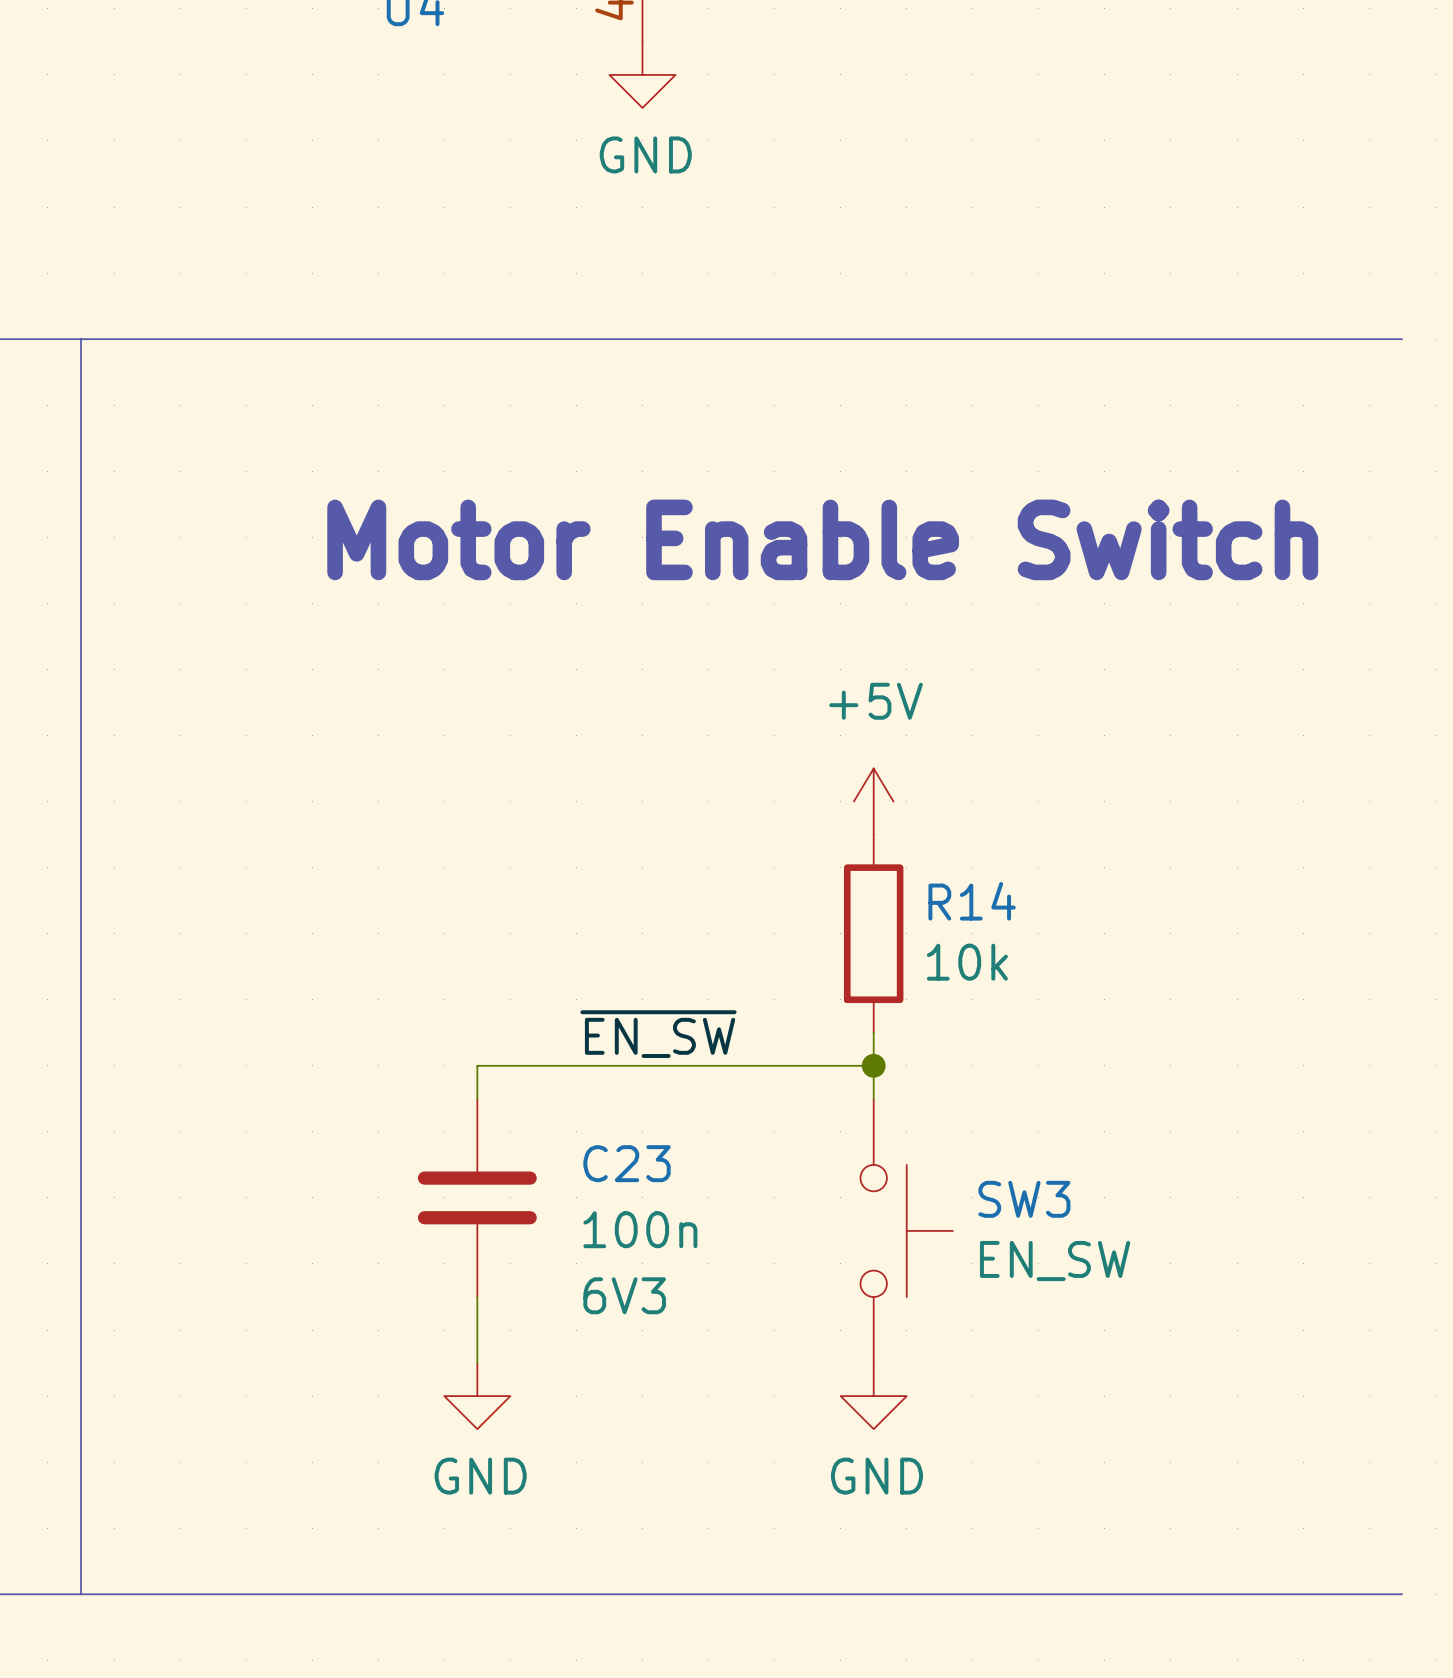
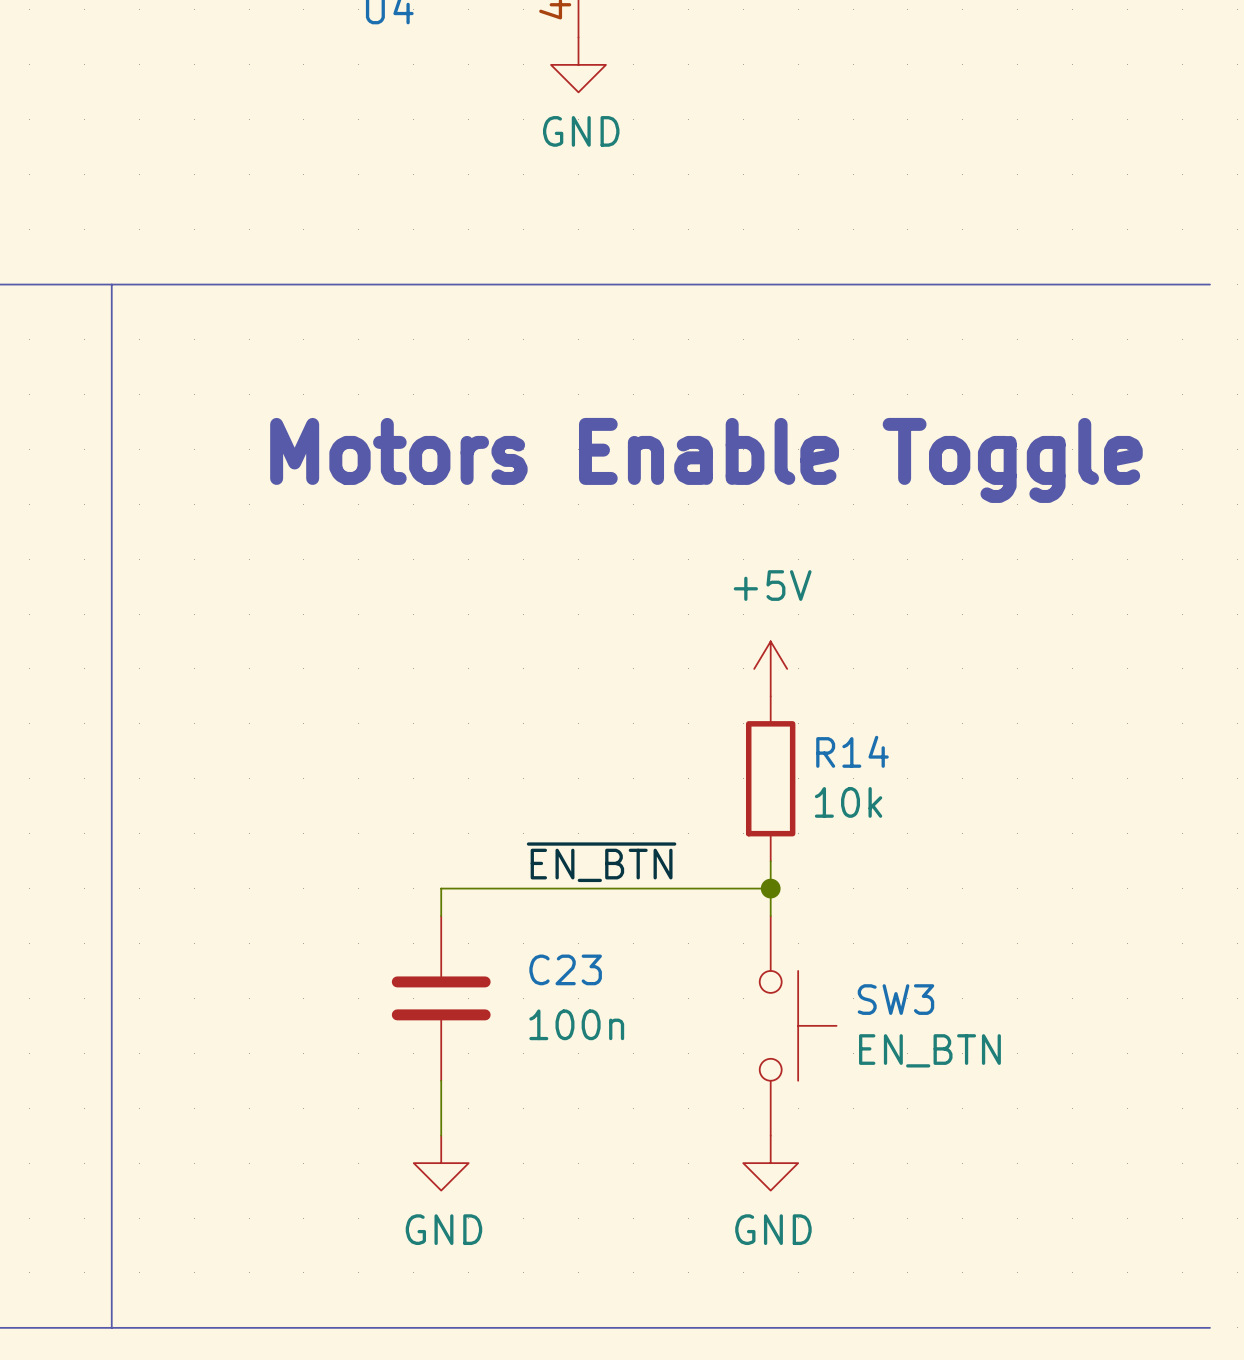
text: Motor Enable Switch (822, 539) -> Motors Enable Toggle (706, 460)
label: ~{EN_SW} (658, 1034) -> ~{EN_BTN} (601, 862)
SW3 value: EN_SW (1055, 1261) -> EN_BTN (929, 1050)
C23 text: 6V3 (624, 1295) -> none

